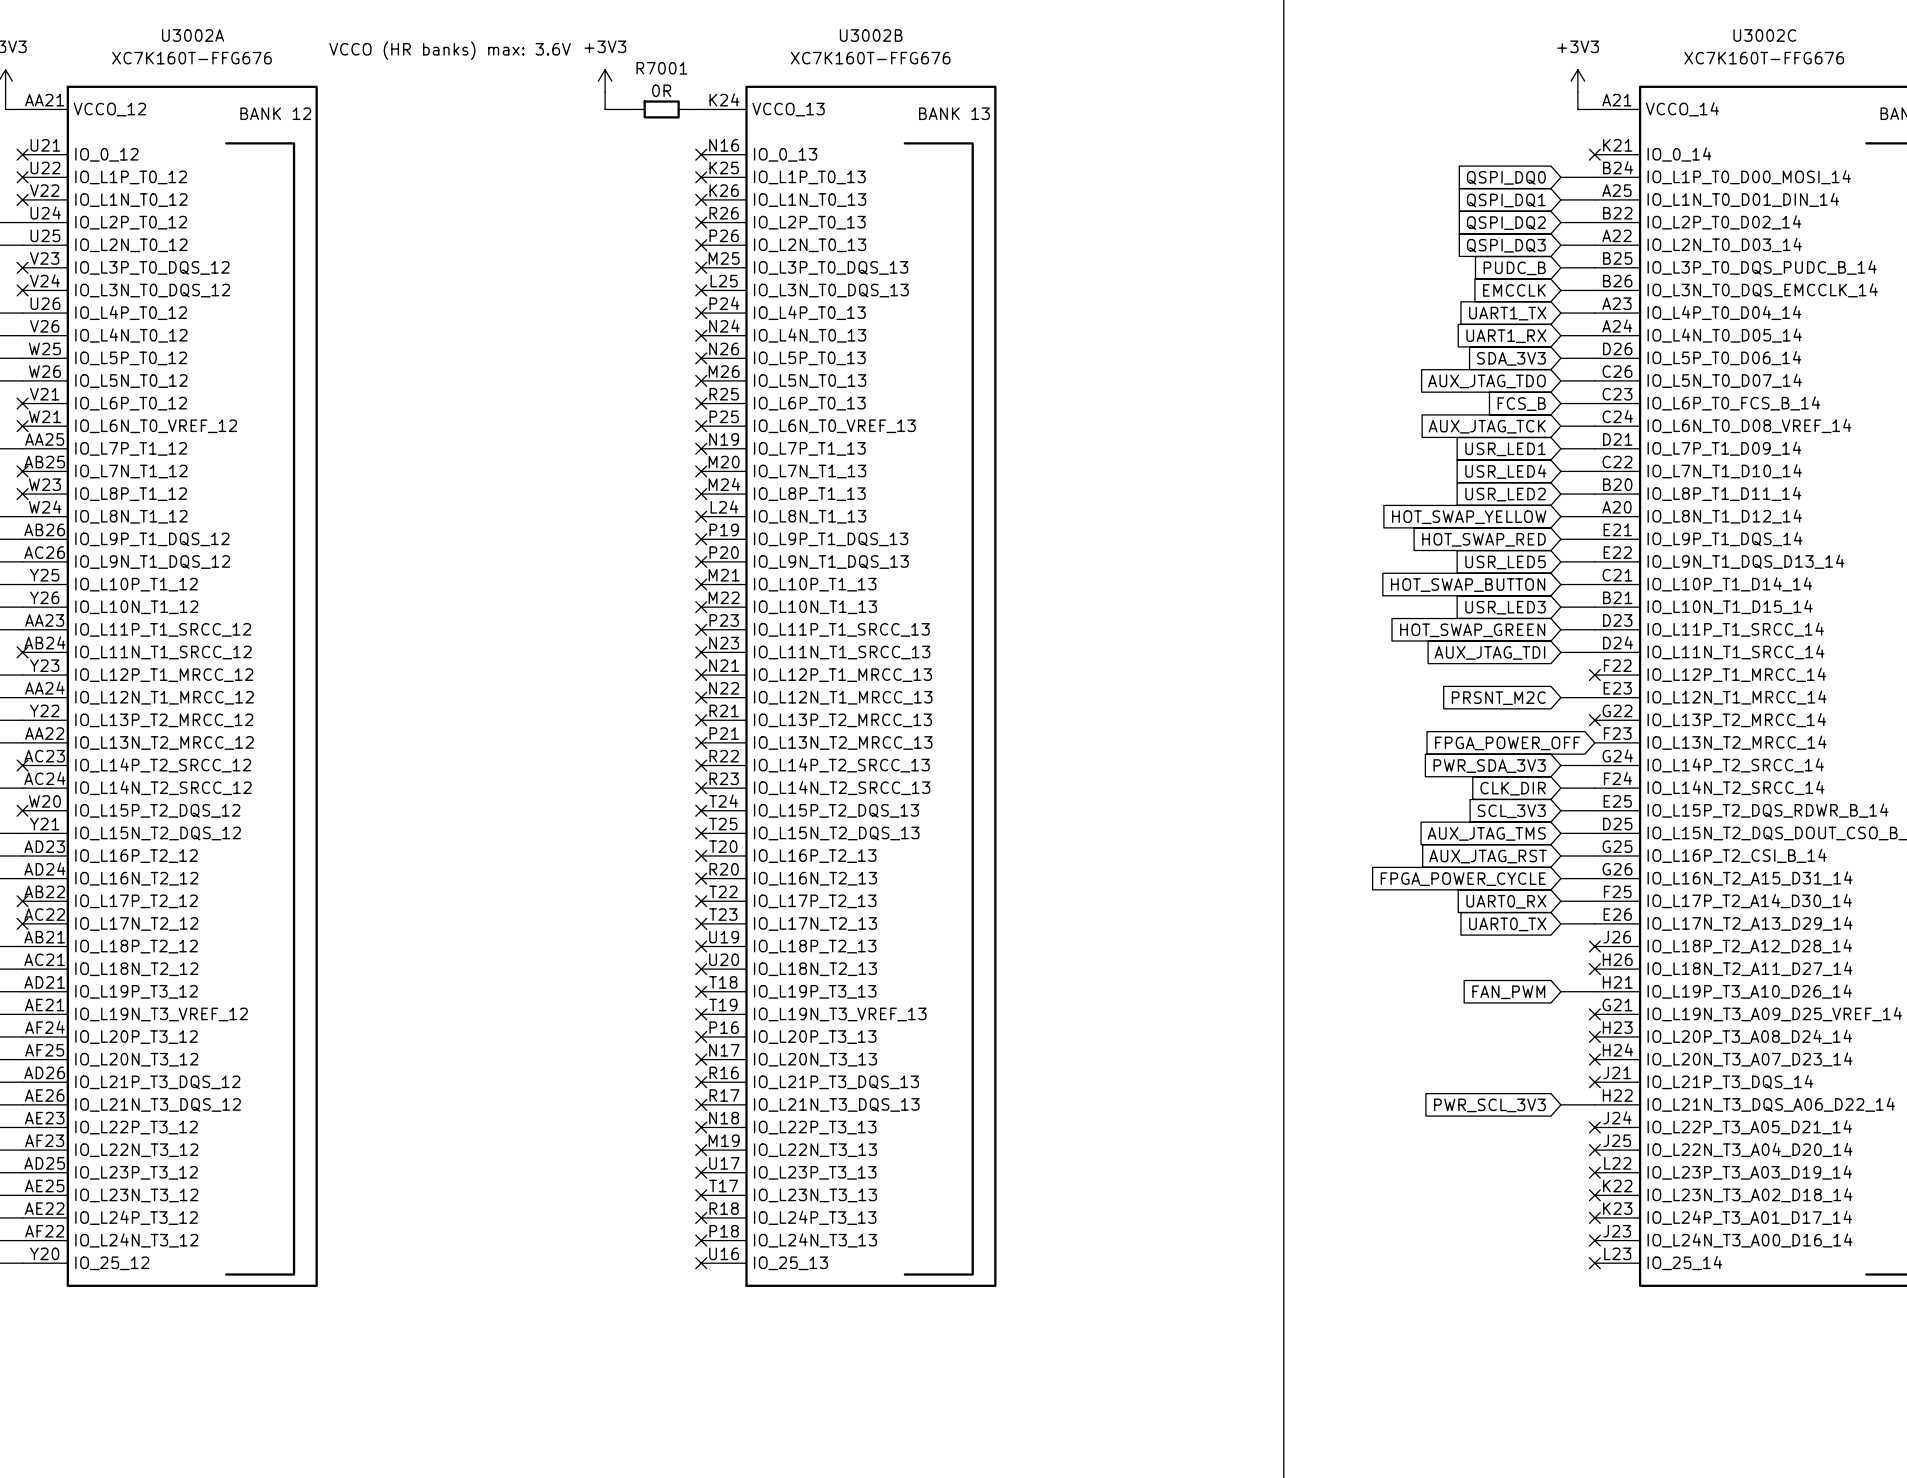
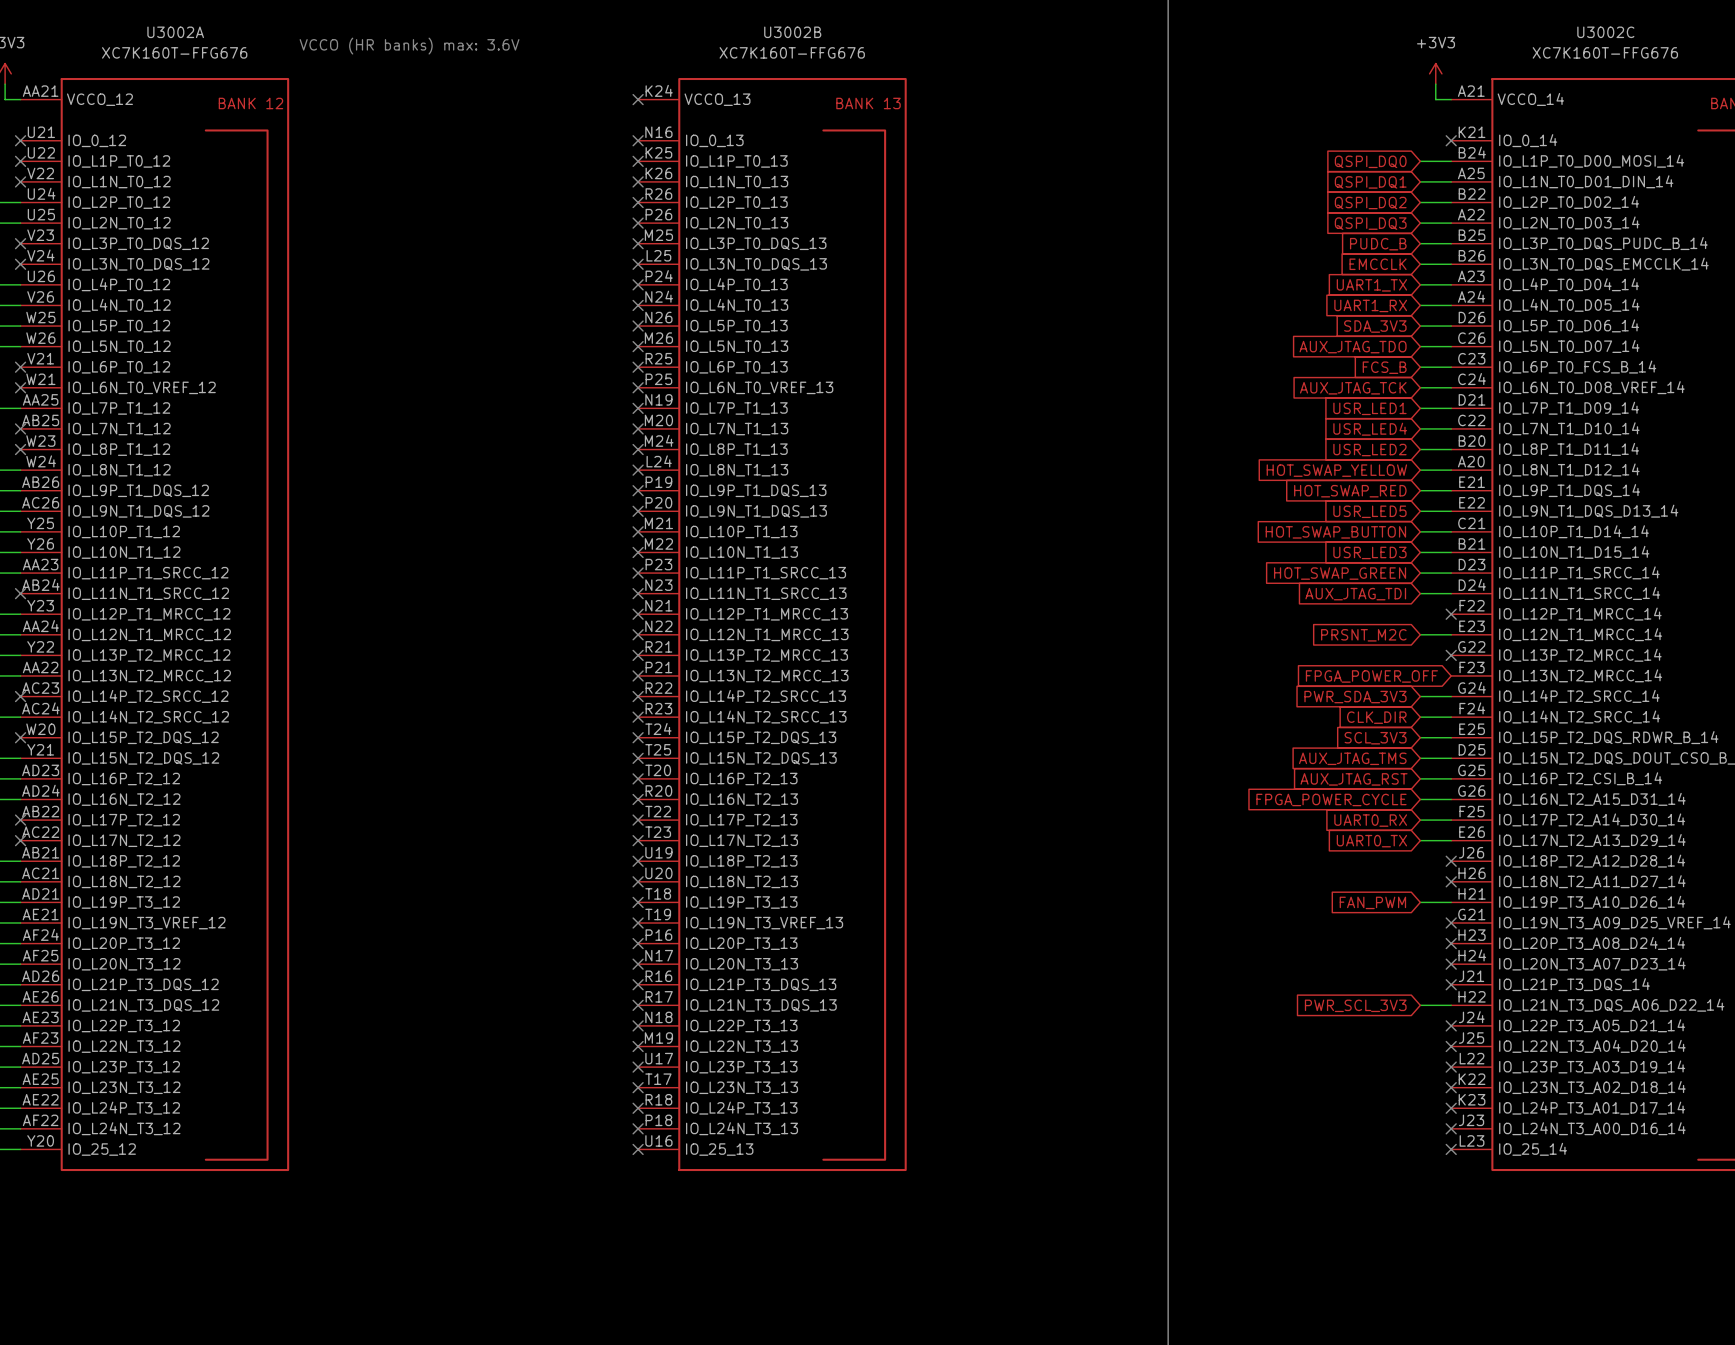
power symbol: +3V3 (605, 81) -> none
wire: (605, 92) (605, 109) (639, 109) -> none
R7001: (661, 109) -> none
wire: (684, 109) (701, 109) -> none
no-connect mark: none -> (638, 99)

